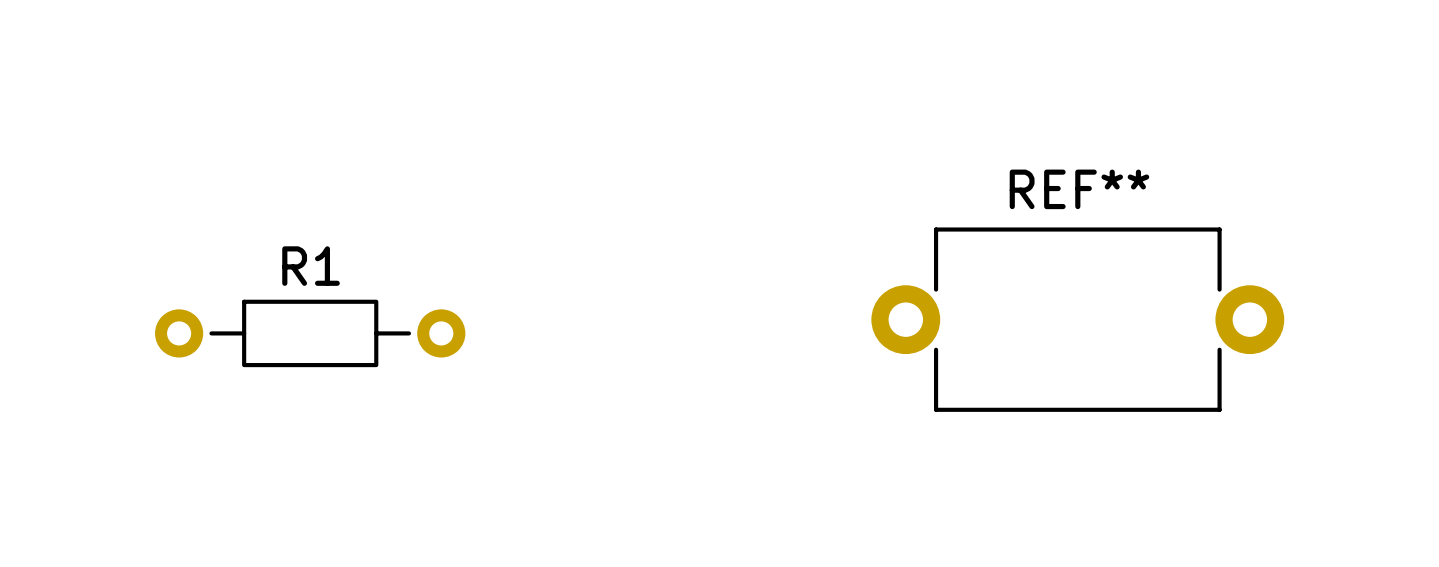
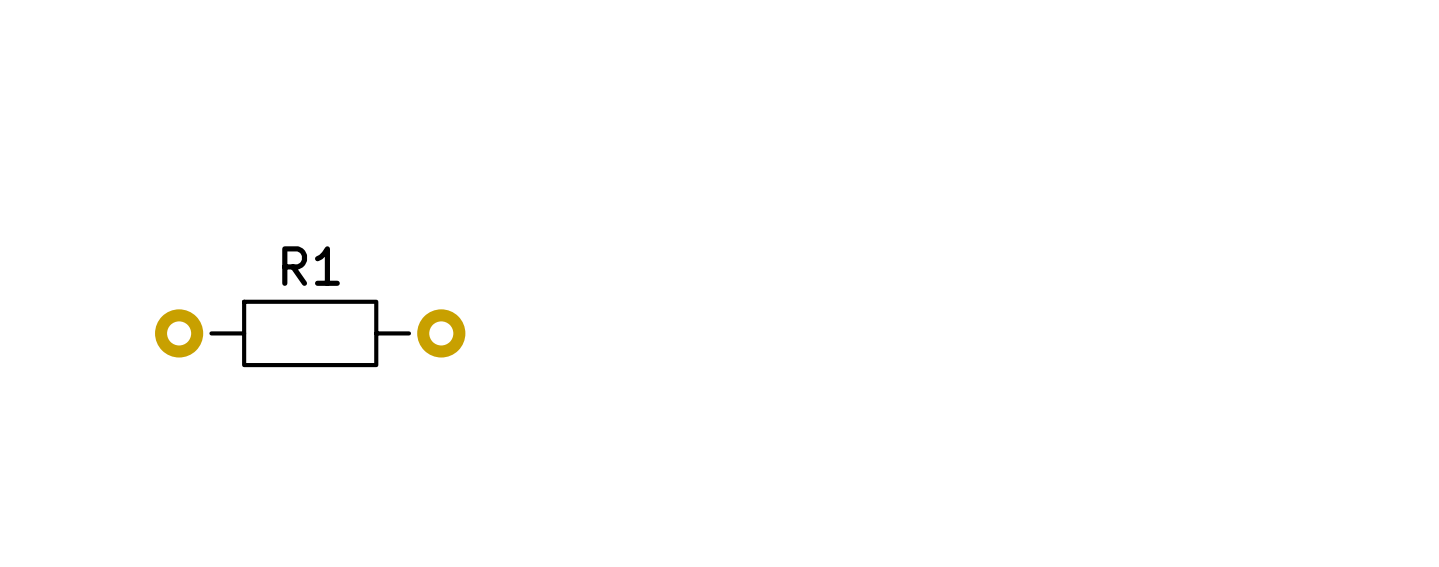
REF**: (1077, 319) -> none

